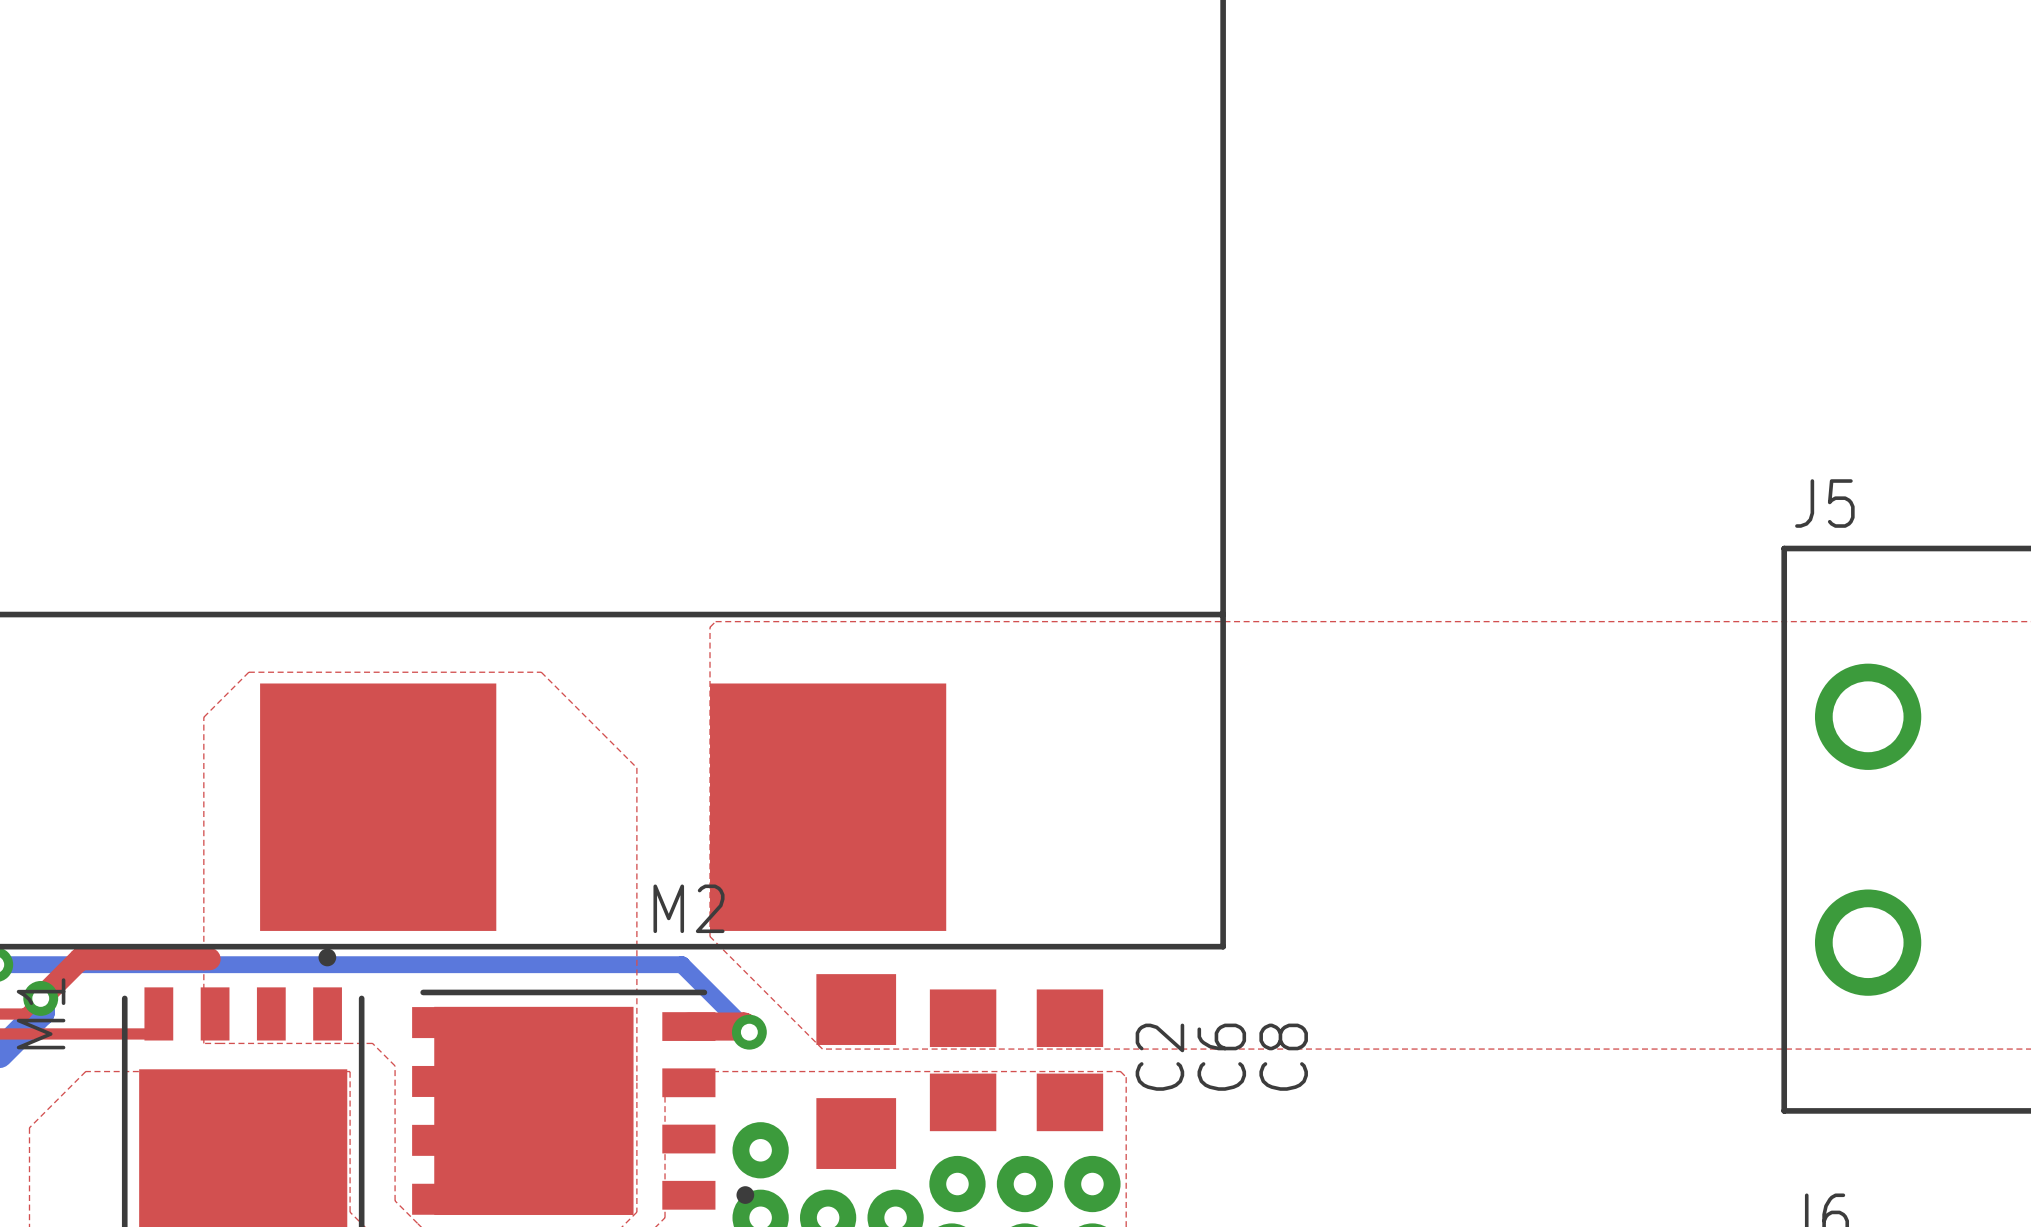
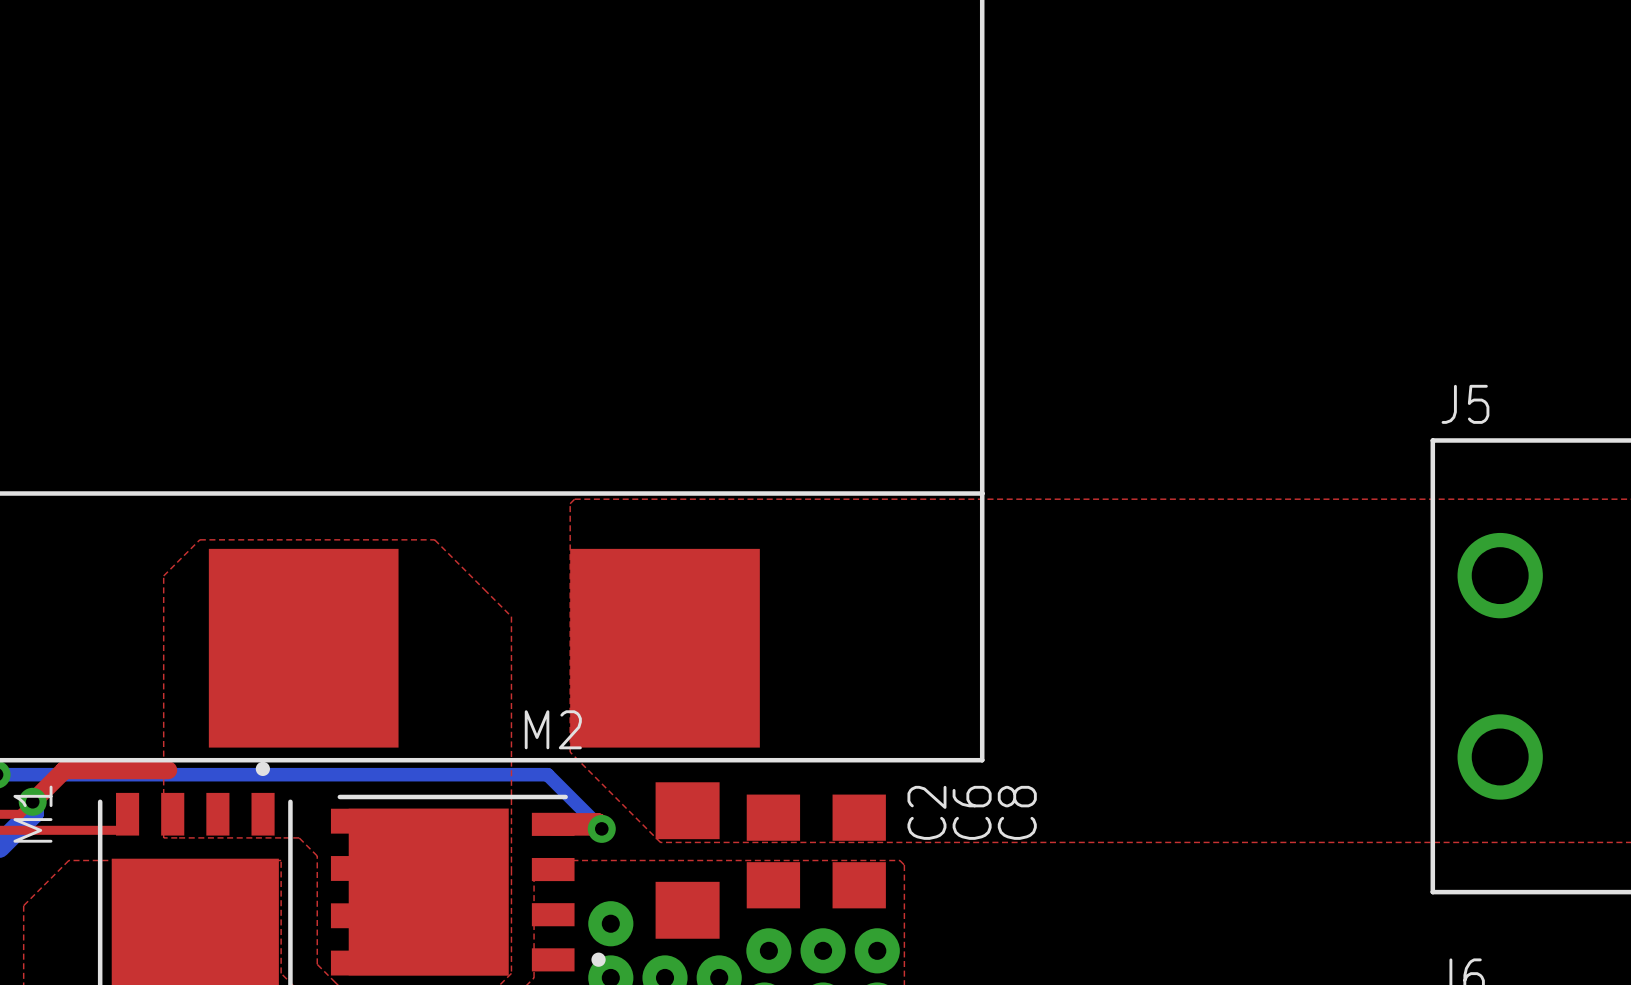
C2 name position: C2 (1159, 1057) -> C2 (926, 812)
C6 name position: C6 (1221, 1057) -> C6 (972, 812)
C8 name position: C8 (1283, 1057) -> C8 (1017, 812)

